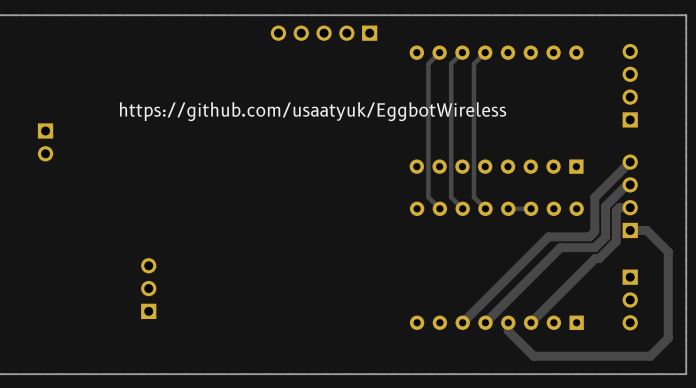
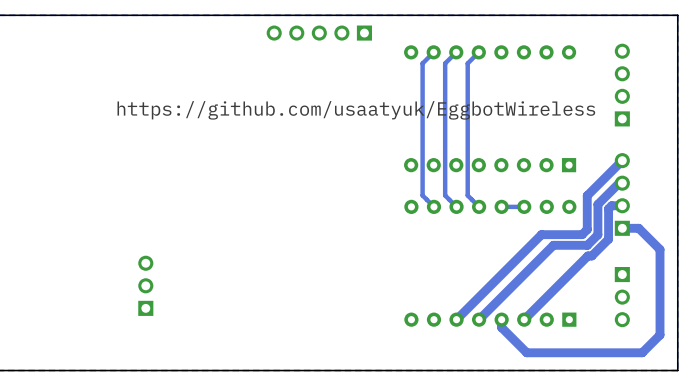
part: (45, 142) -> none

